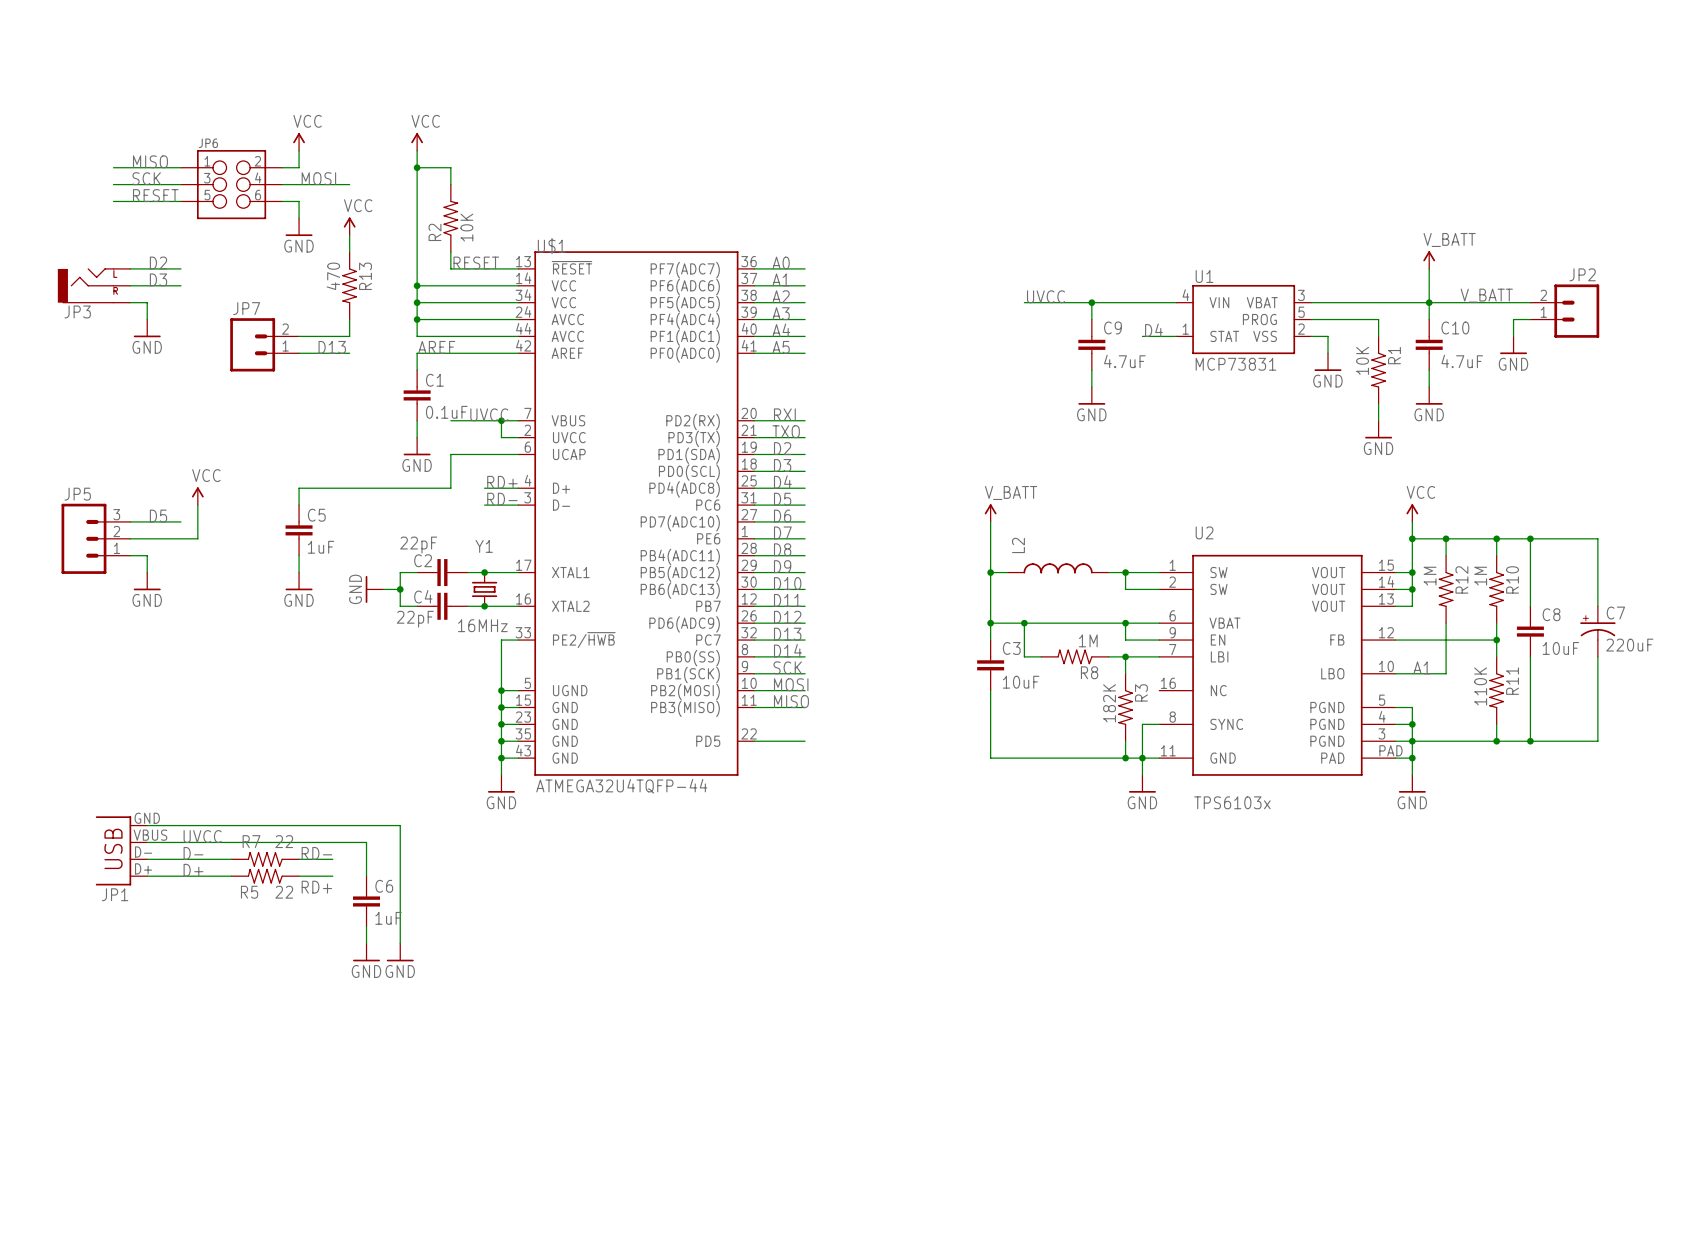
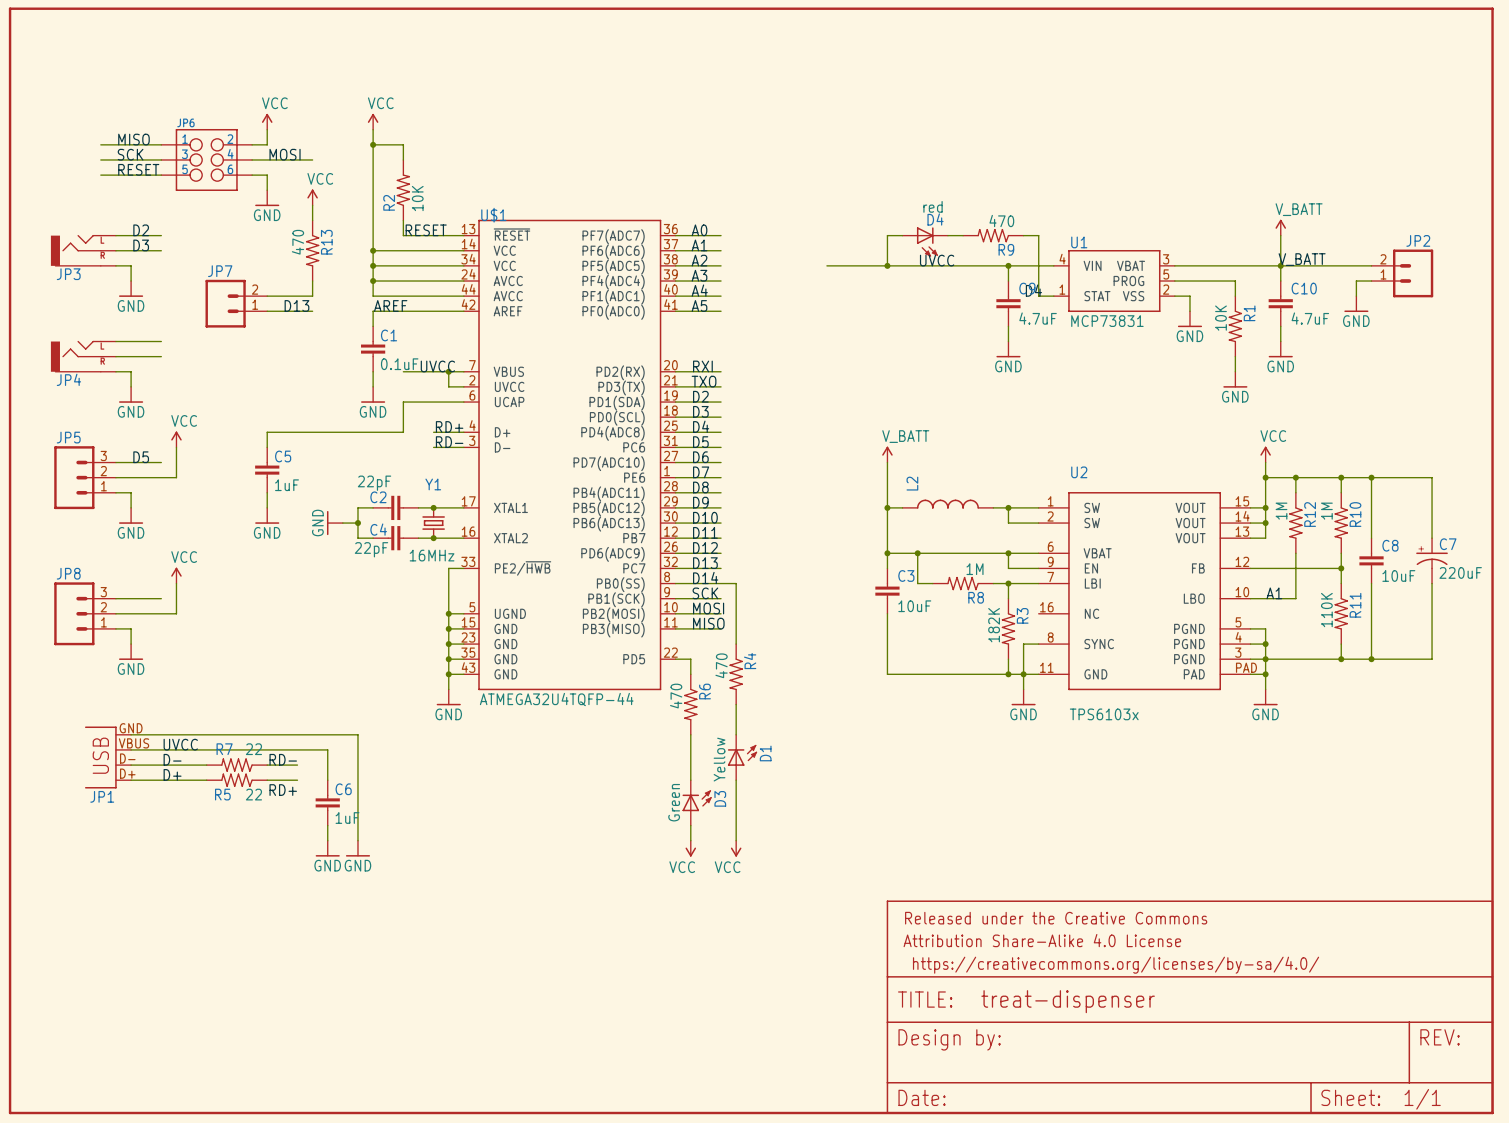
wire: none -> (902, 235) (887, 235) (887, 265)
wire: none -> (947, 235) (963, 235)
R9: none -> 470 (993, 235)
D4: none -> red (925, 241)
label position: V_BATT (1486, 295) -> V_BATT (1302, 259)
wire: none -> (826, 265) (917, 265)
junction: none -> (887, 265)
wire: (1091, 302) (1091, 319) -> (1008, 265) (1008, 281)
junction position: (1091, 302) -> (1008, 265)
wire: (1142, 336) (1159, 336) -> (1023, 235) (1038, 235) (1038, 296)
C9 position: (1091, 344) -> (1008, 303)
wire: (1091, 370) (1091, 387) -> (1008, 326) (1008, 341)
wire: none -> (115, 341) (161, 341)
power symbol position: GND (1091, 395) -> GND (1008, 349)
JP4: none -> (83, 356)
wire: none -> (115, 356) (161, 356)
wire: none -> (115, 371) (131, 371) (131, 386)
power symbol: none -> GND (131, 394)
part: none -> (751, 560)
power symbol: none -> VCC (176, 575)
wire: none -> (176, 583) (176, 613) (115, 613)
wire: none -> (721, 583) (736, 583) (736, 644)
wire: none -> (115, 598) (161, 598)
JP8: none -> (85, 613)
wire: none -> (115, 628) (131, 628) (131, 644)
power symbol: none -> GND (131, 652)
wire: (771, 741) (805, 741) -> (690, 659) (690, 674)
R4: none -> 470 (736, 674)
R6: none -> 470 (690, 704)
wire: none -> (736, 704) (736, 734)
wire: none -> (690, 734) (690, 780)
D1: none -> Yellow (742, 757)
wire: none -> (736, 780) (736, 840)
D3: none -> Green (697, 802)
wire: none -> (690, 825) (690, 840)
power symbol: none -> VCC (690, 848)
power symbol: none -> VCC (736, 848)
part: none -> (1189, 1007)

